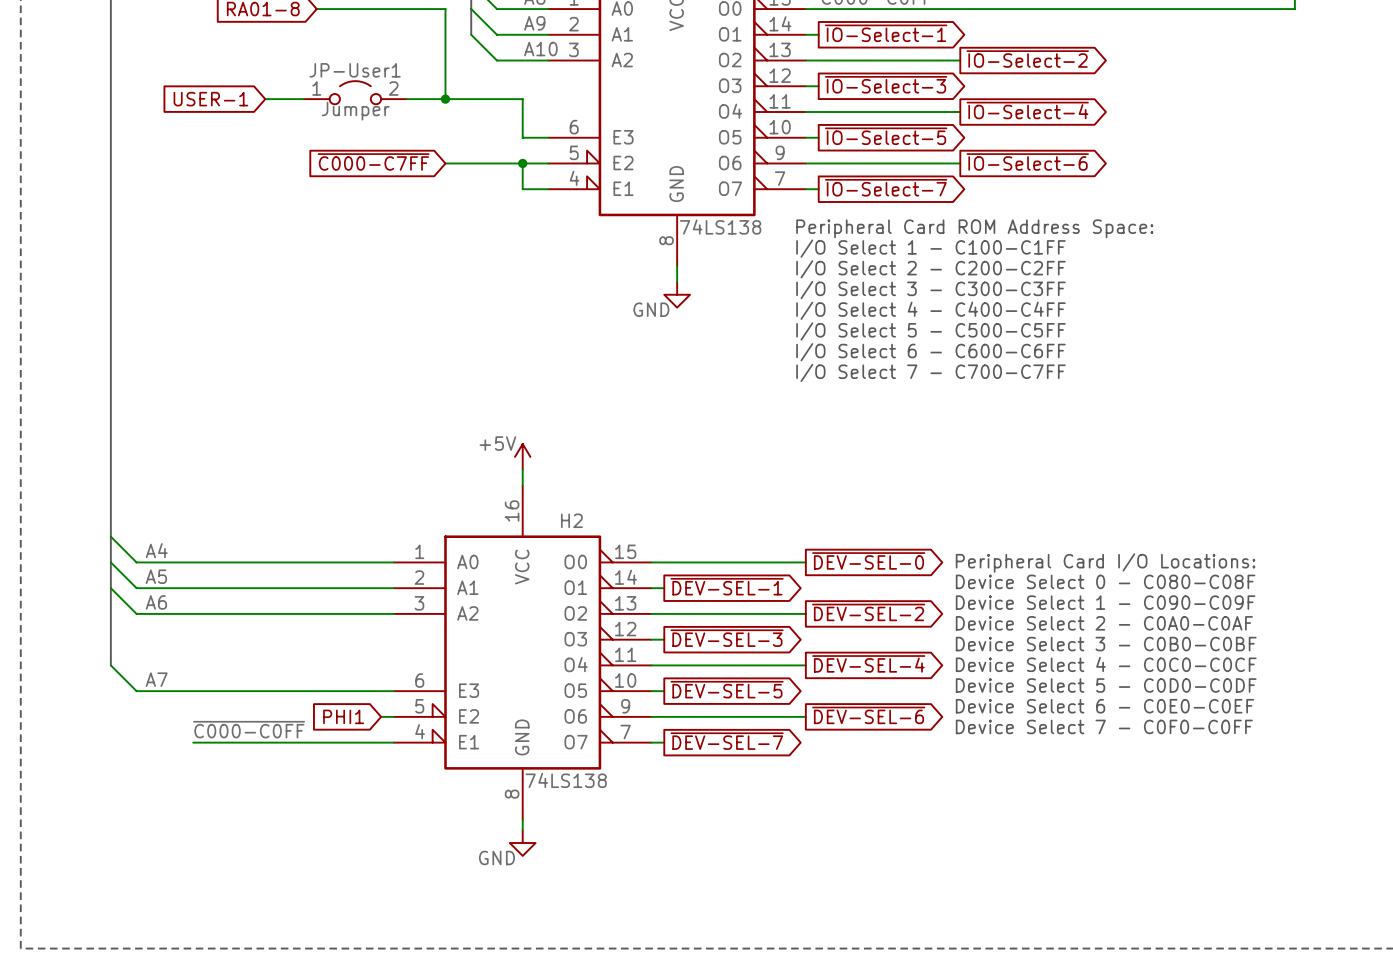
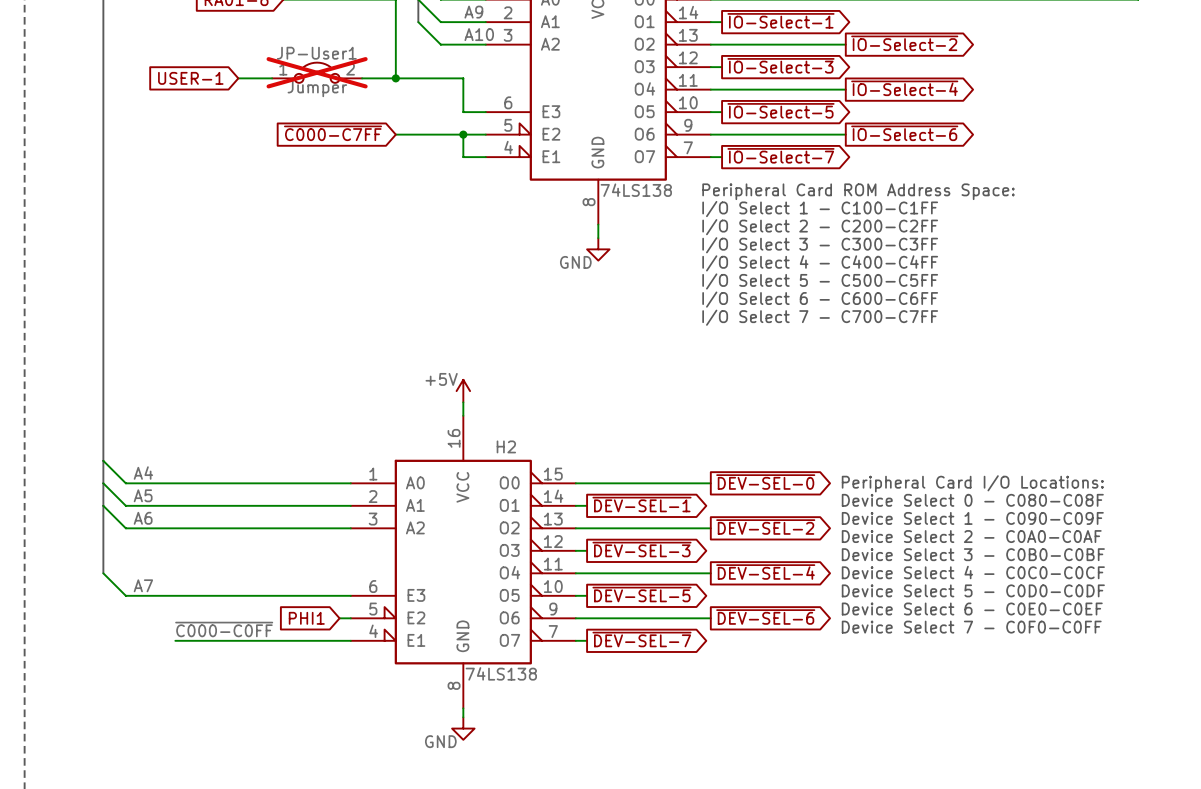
JP-User1 do-not-place cross: none -> (317, 72)

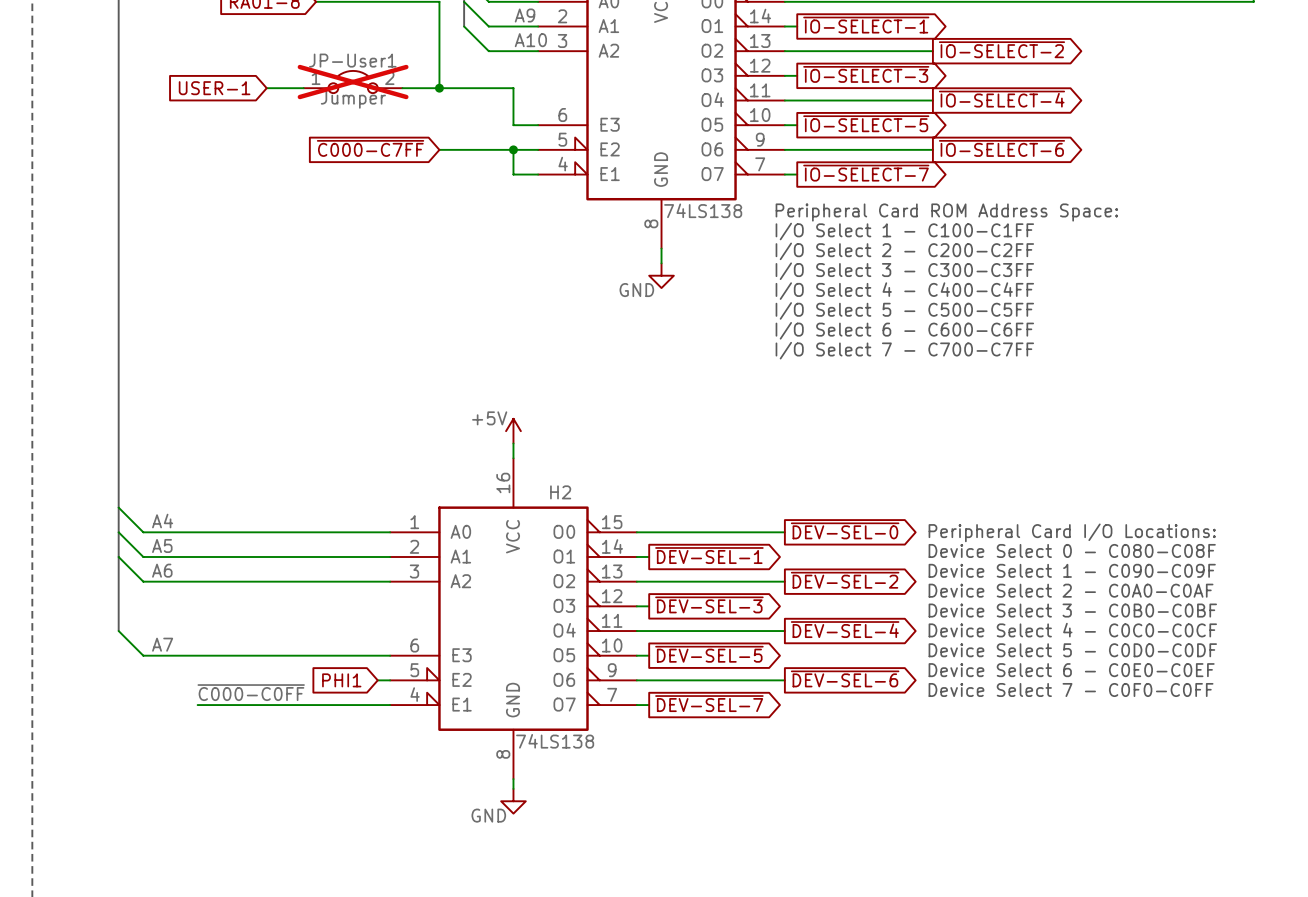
global label: ~{IO-Select-1} (781, 20) -> ~{IO-SELECT-1} (866, 25)
global label: ~{IO-Select-2} (904, 43) -> ~{IO-SELECT-2} (1001, 49)
global label: ~{IO-Select-3} (781, 65) -> ~{IO-SELECT-3} (866, 74)
global label: ~{IO-Select-4} (904, 88) -> ~{IO-SELECT-4} (1001, 99)
global label: ~{IO-Select-5} (781, 110) -> ~{IO-SELECT-5} (866, 123)
global label: ~{IO-Select-6} (904, 133) -> ~{IO-SELECT-6} (1001, 148)
global label: ~{IO-Select-7} (781, 155) -> ~{IO-SELECT-7} (866, 173)

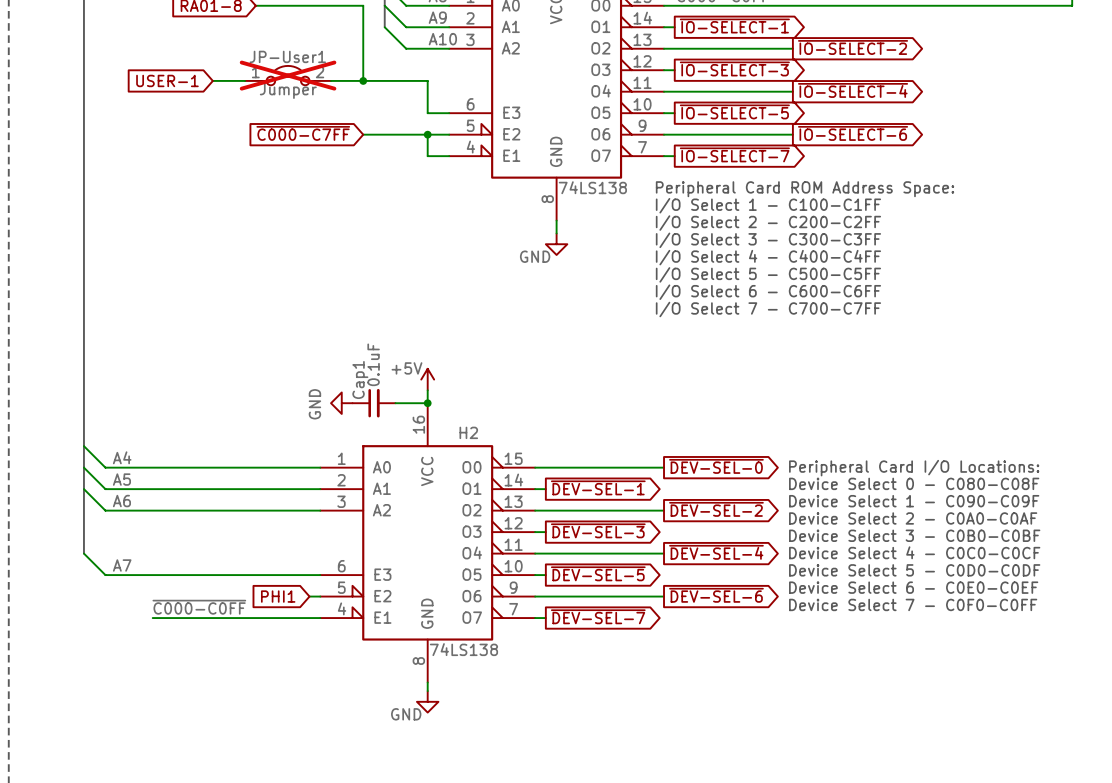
power symbol: none -> GND (341, 403)
Cap1: none -> 0.1uF (373, 403)
wire: none -> (395, 403) (427, 403)
junction: none -> (427, 403)

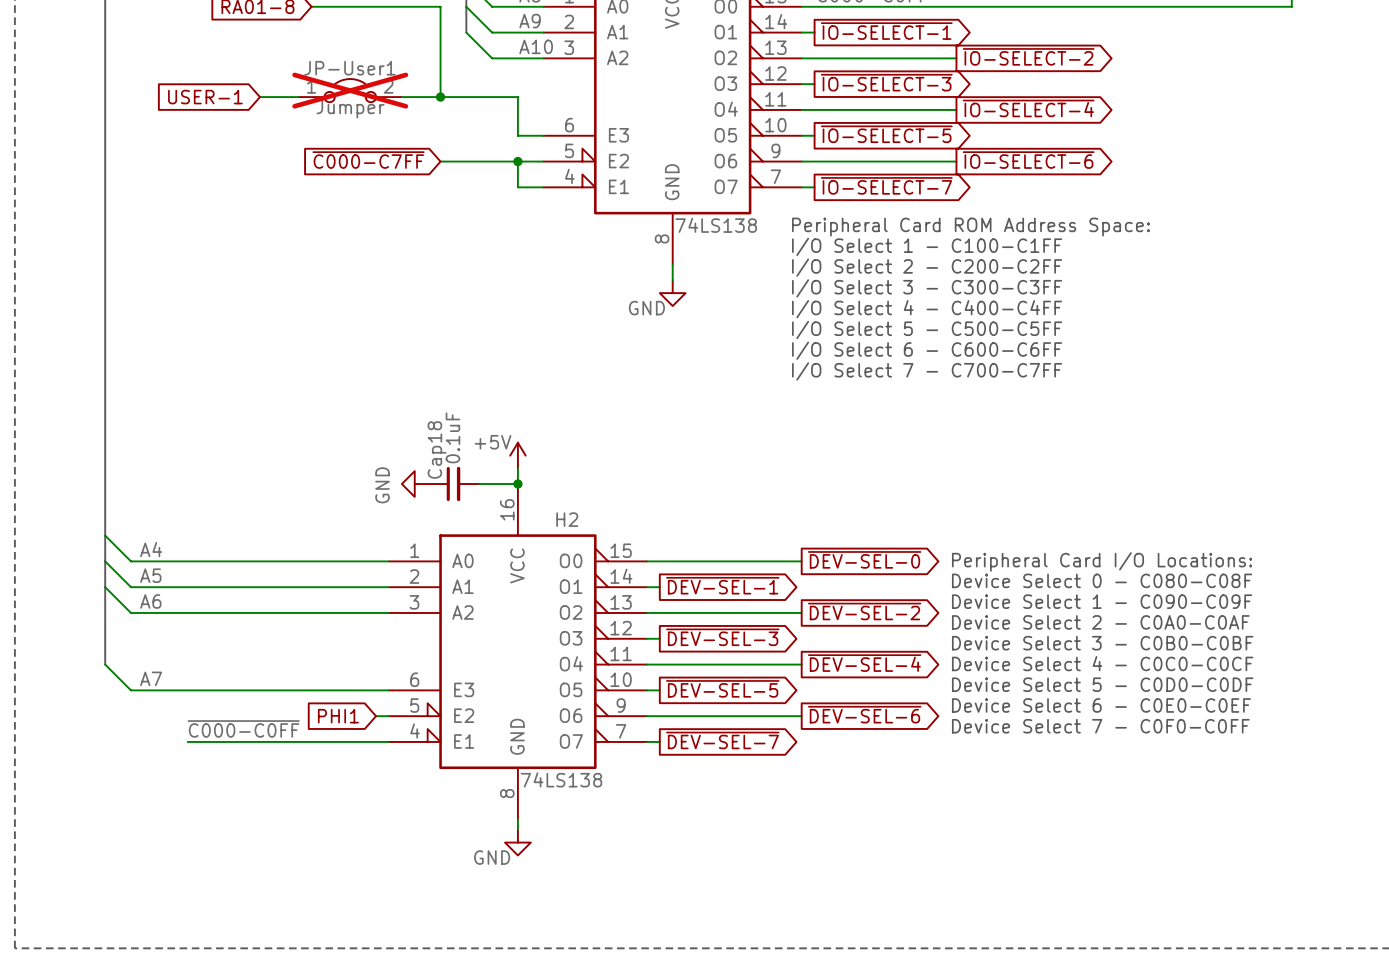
Cap1 name: Cap1 (360, 380) -> Cap18 (437, 450)

